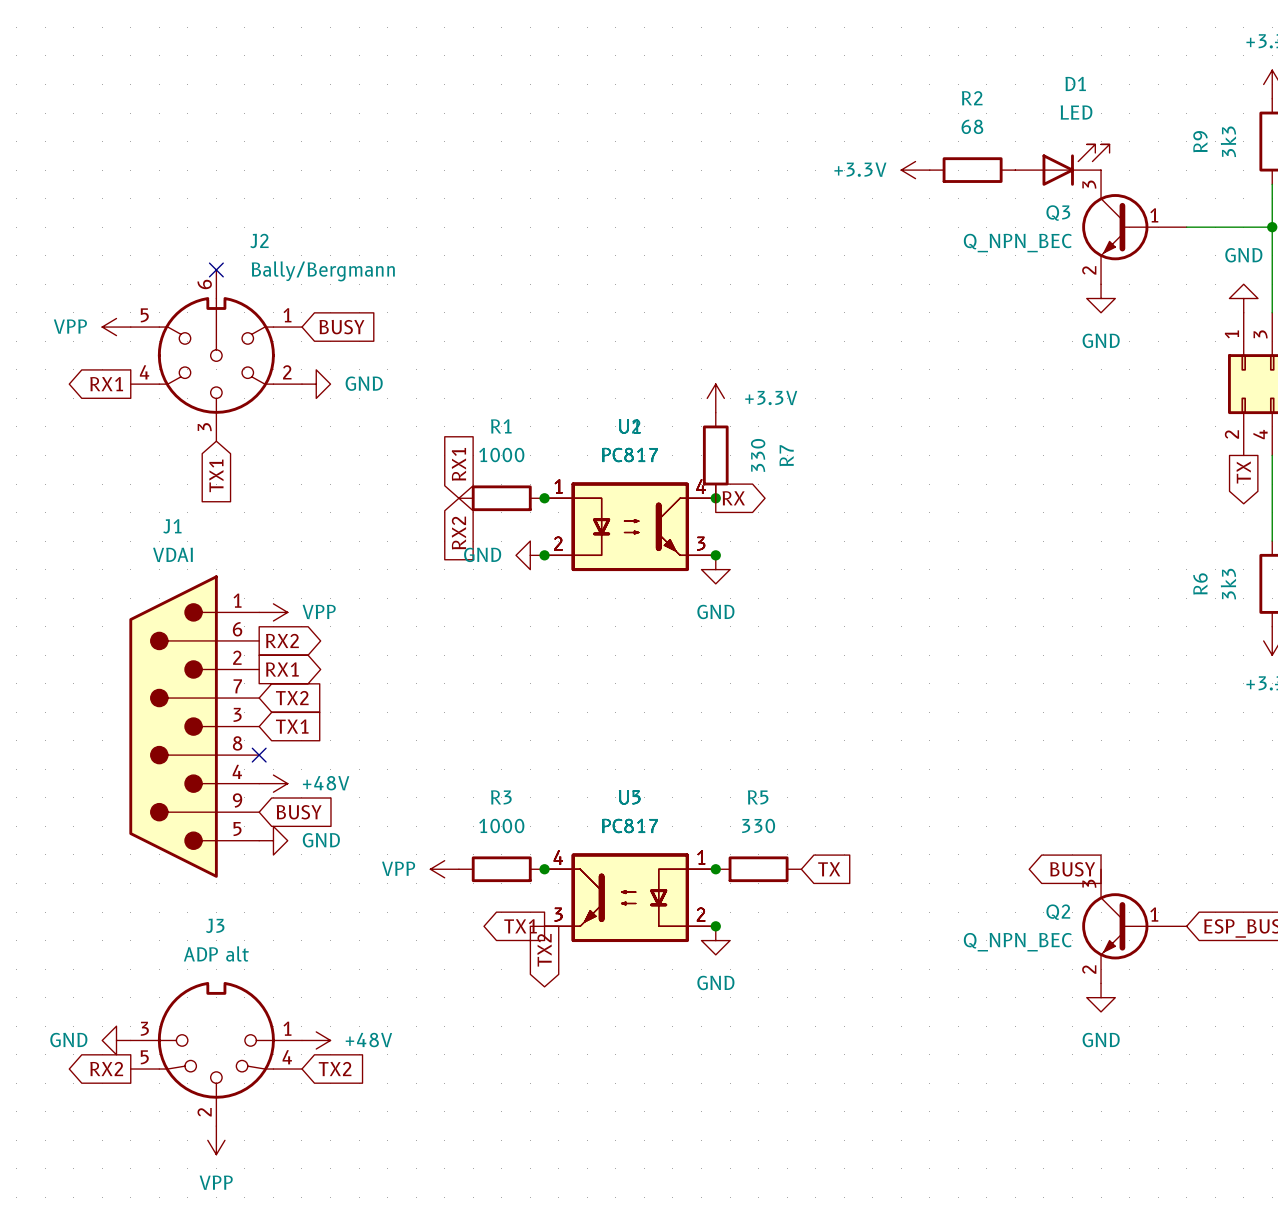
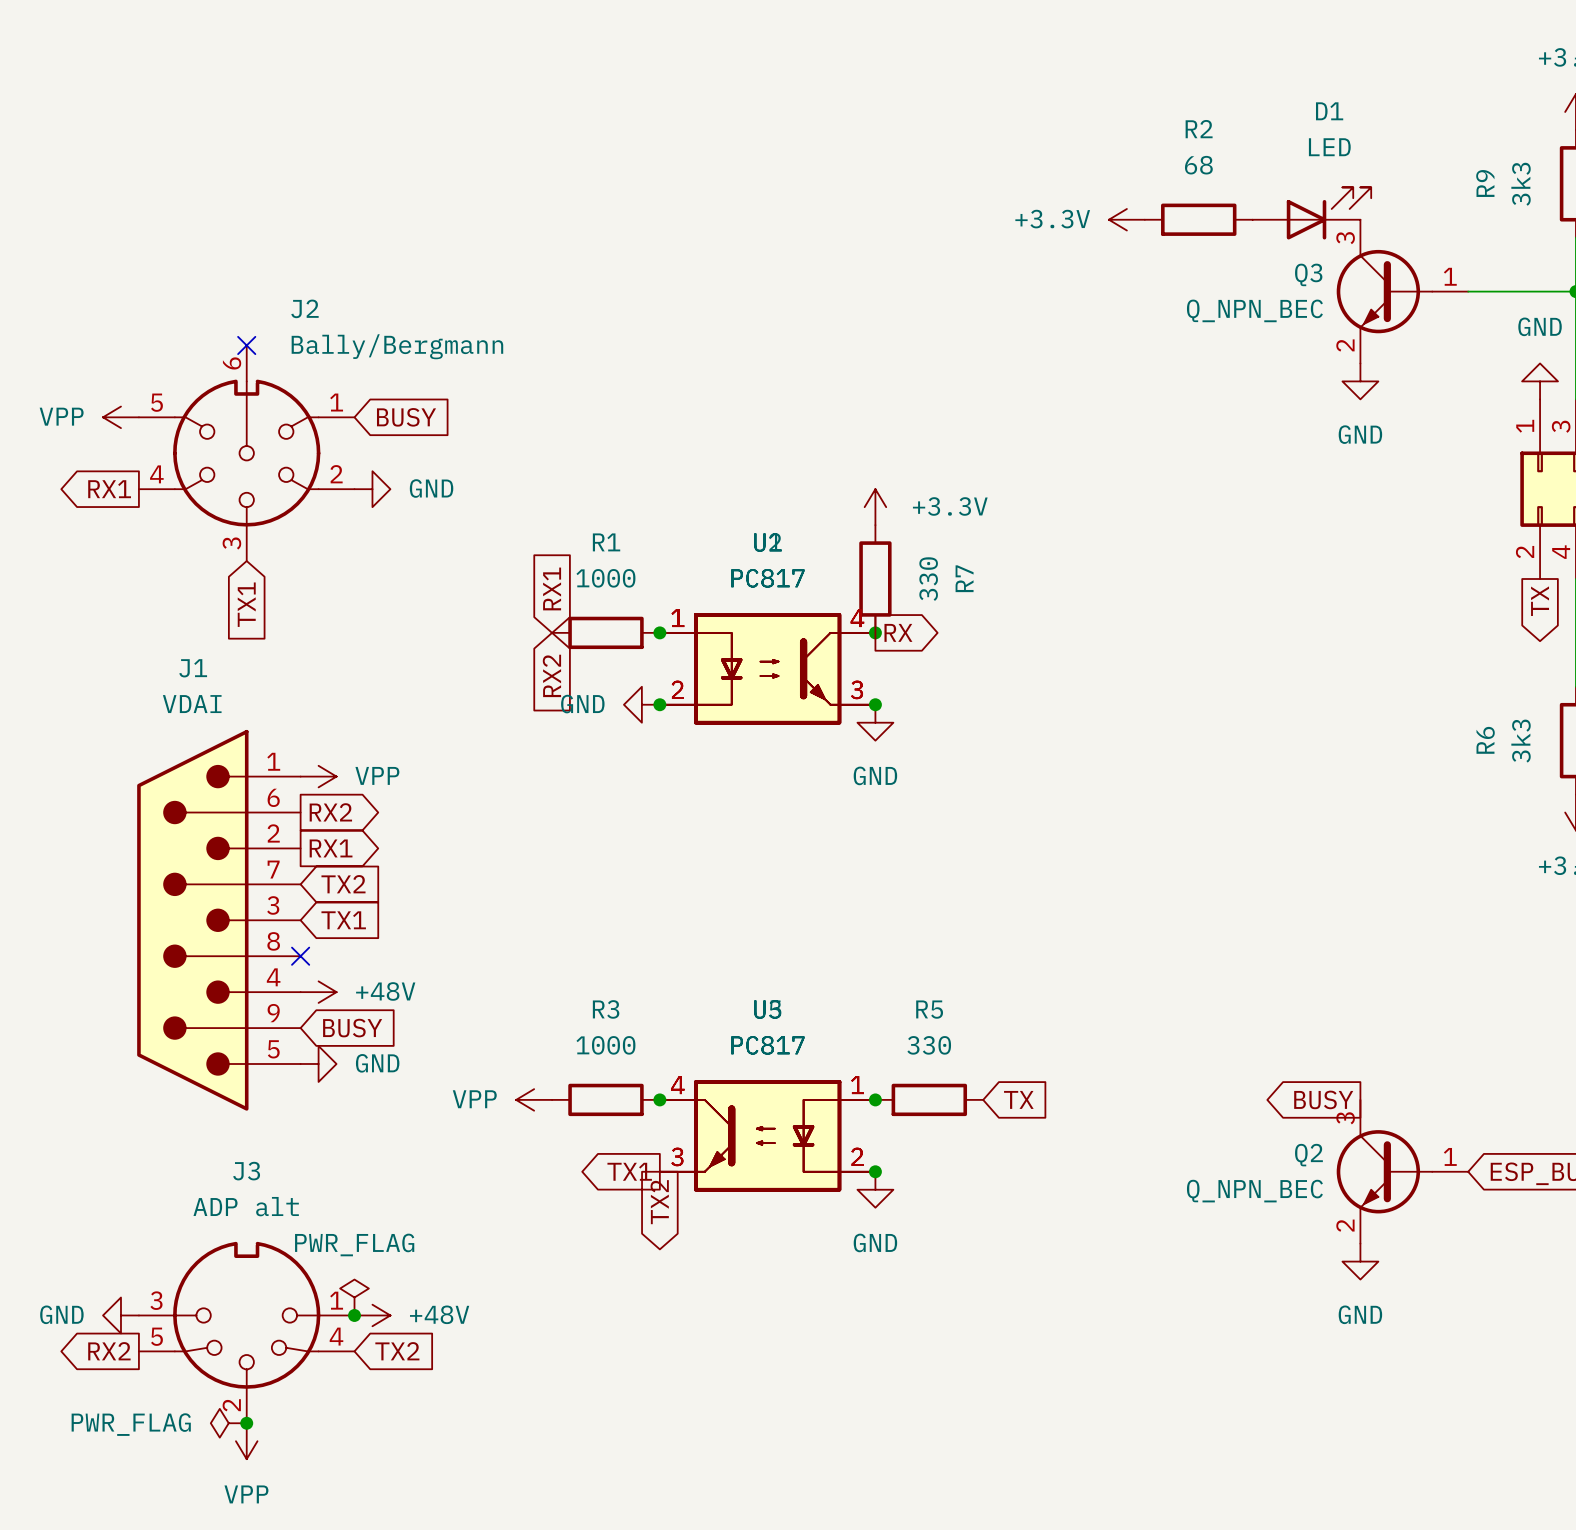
Q3 symbol: [1082, 170, 1187, 285] -> [1336, 219, 1469, 364]
Q2 symbol: [1082, 869, 1187, 984] -> [1336, 1099, 1469, 1244]
power symbol: none -> PWR_FLAG (354, 1297)
junction: none -> (354, 1315)
power symbol: none -> PWR_FLAG (228, 1423)
junction: none -> (246, 1423)

